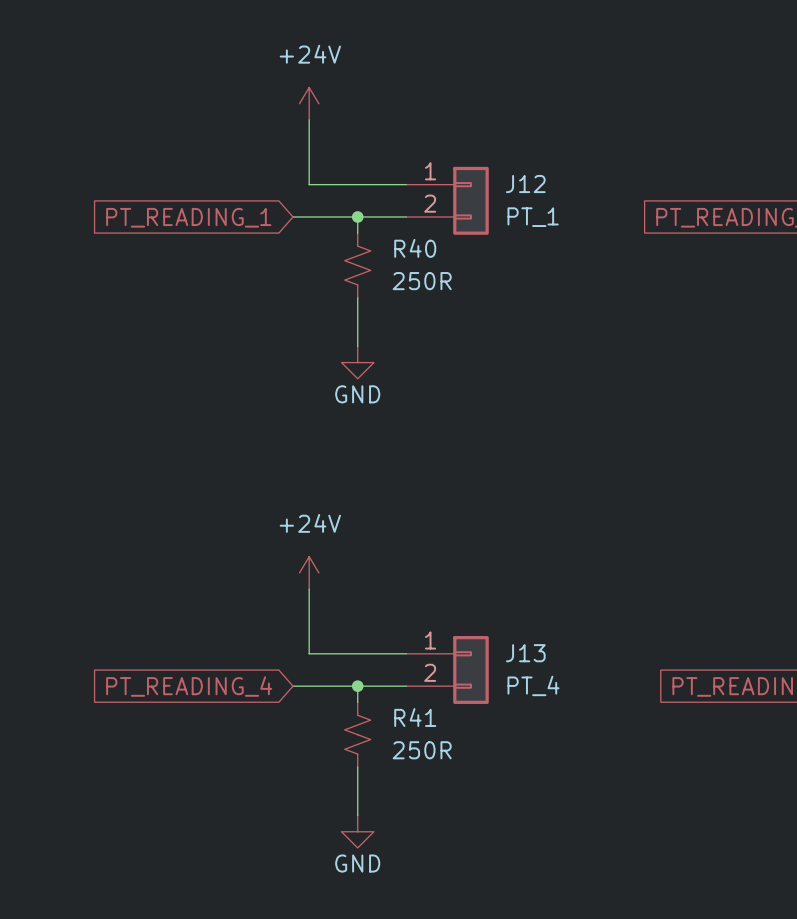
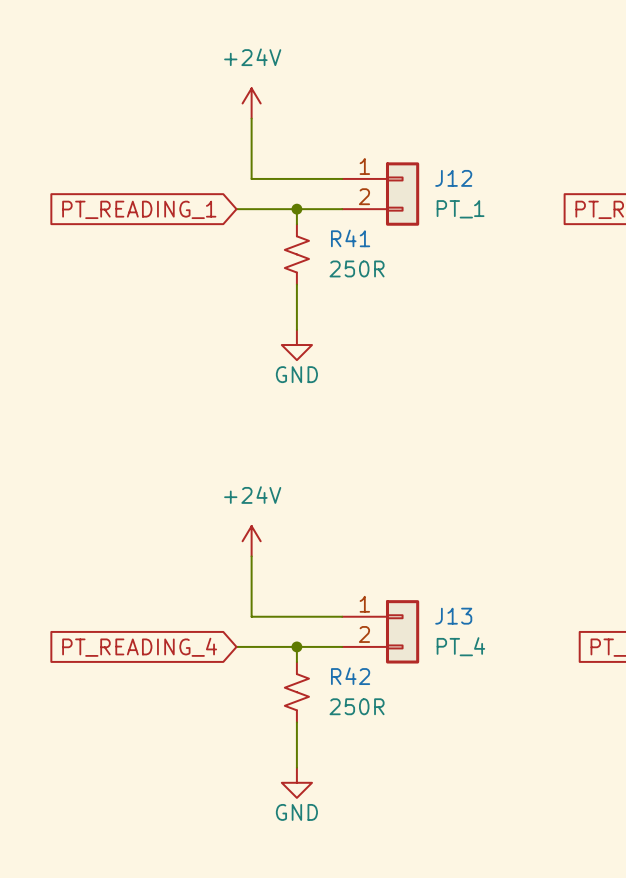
R40 name: R40 (415, 248) -> R41 (350, 238)
R41 name: R41 (415, 717) -> R42 (350, 676)

